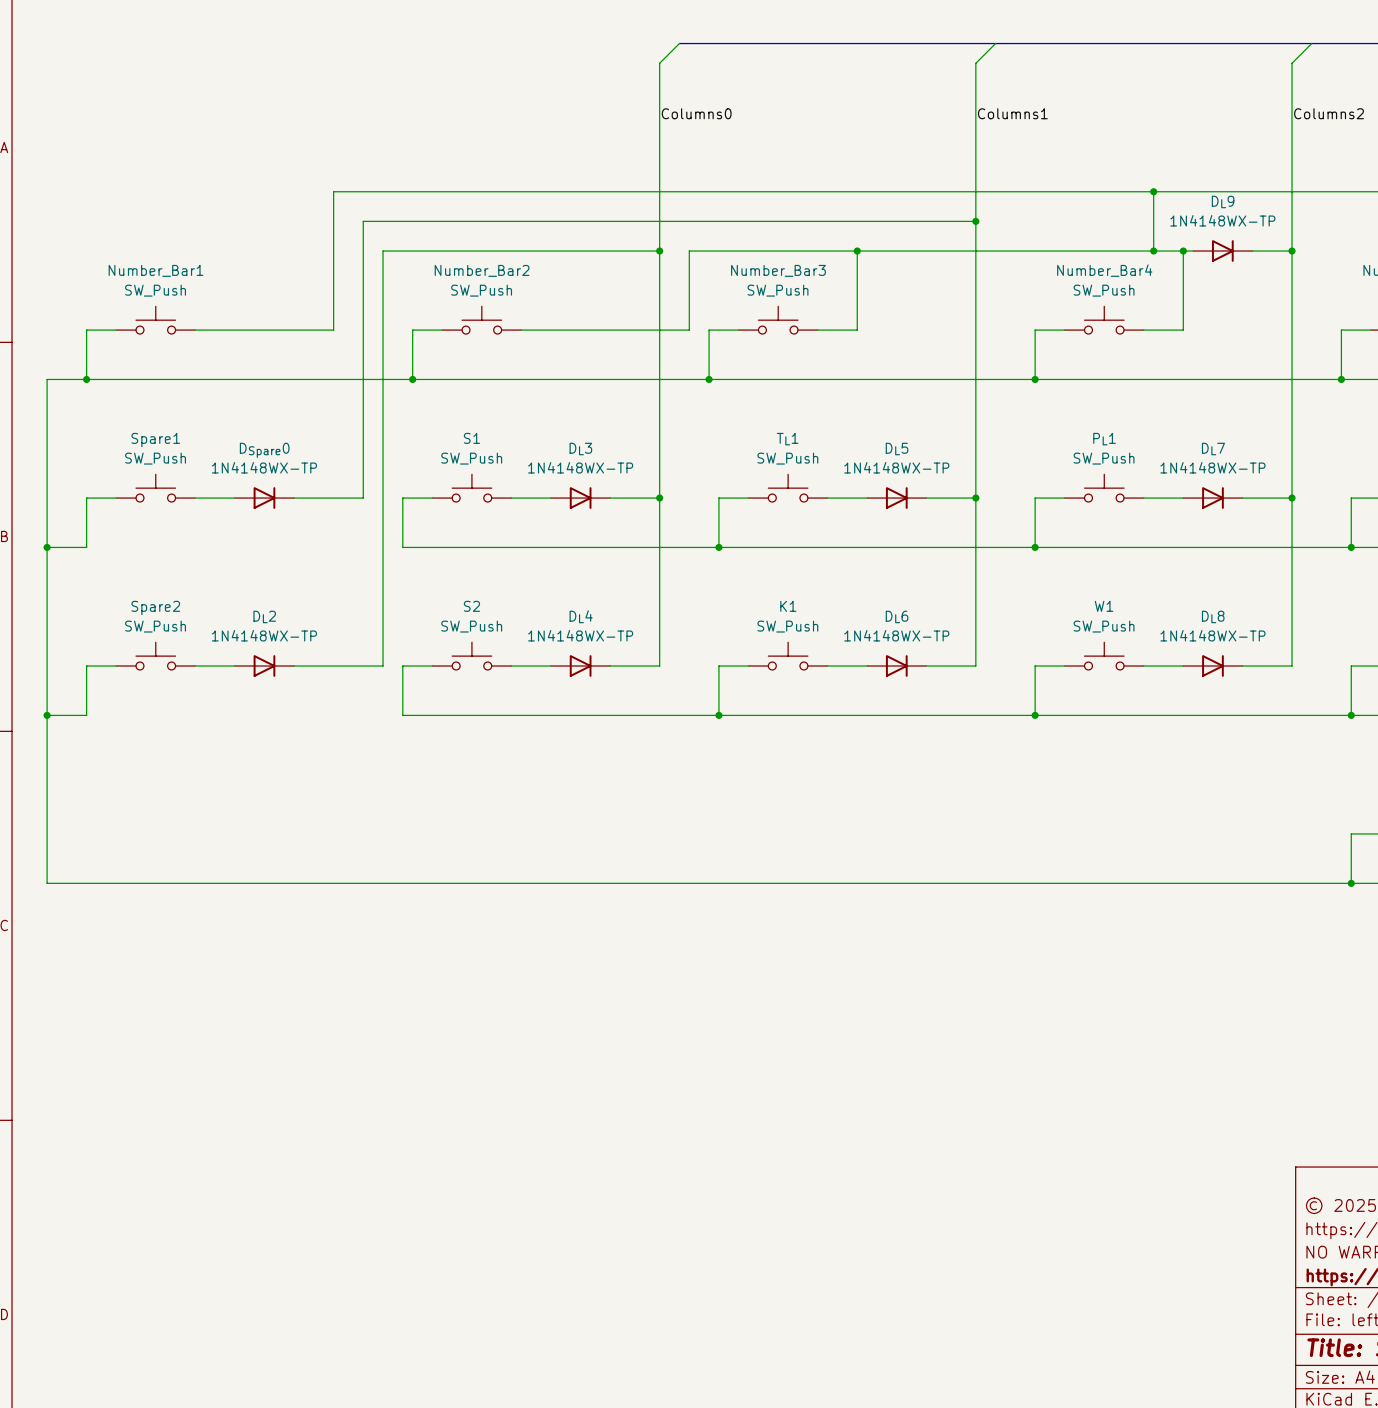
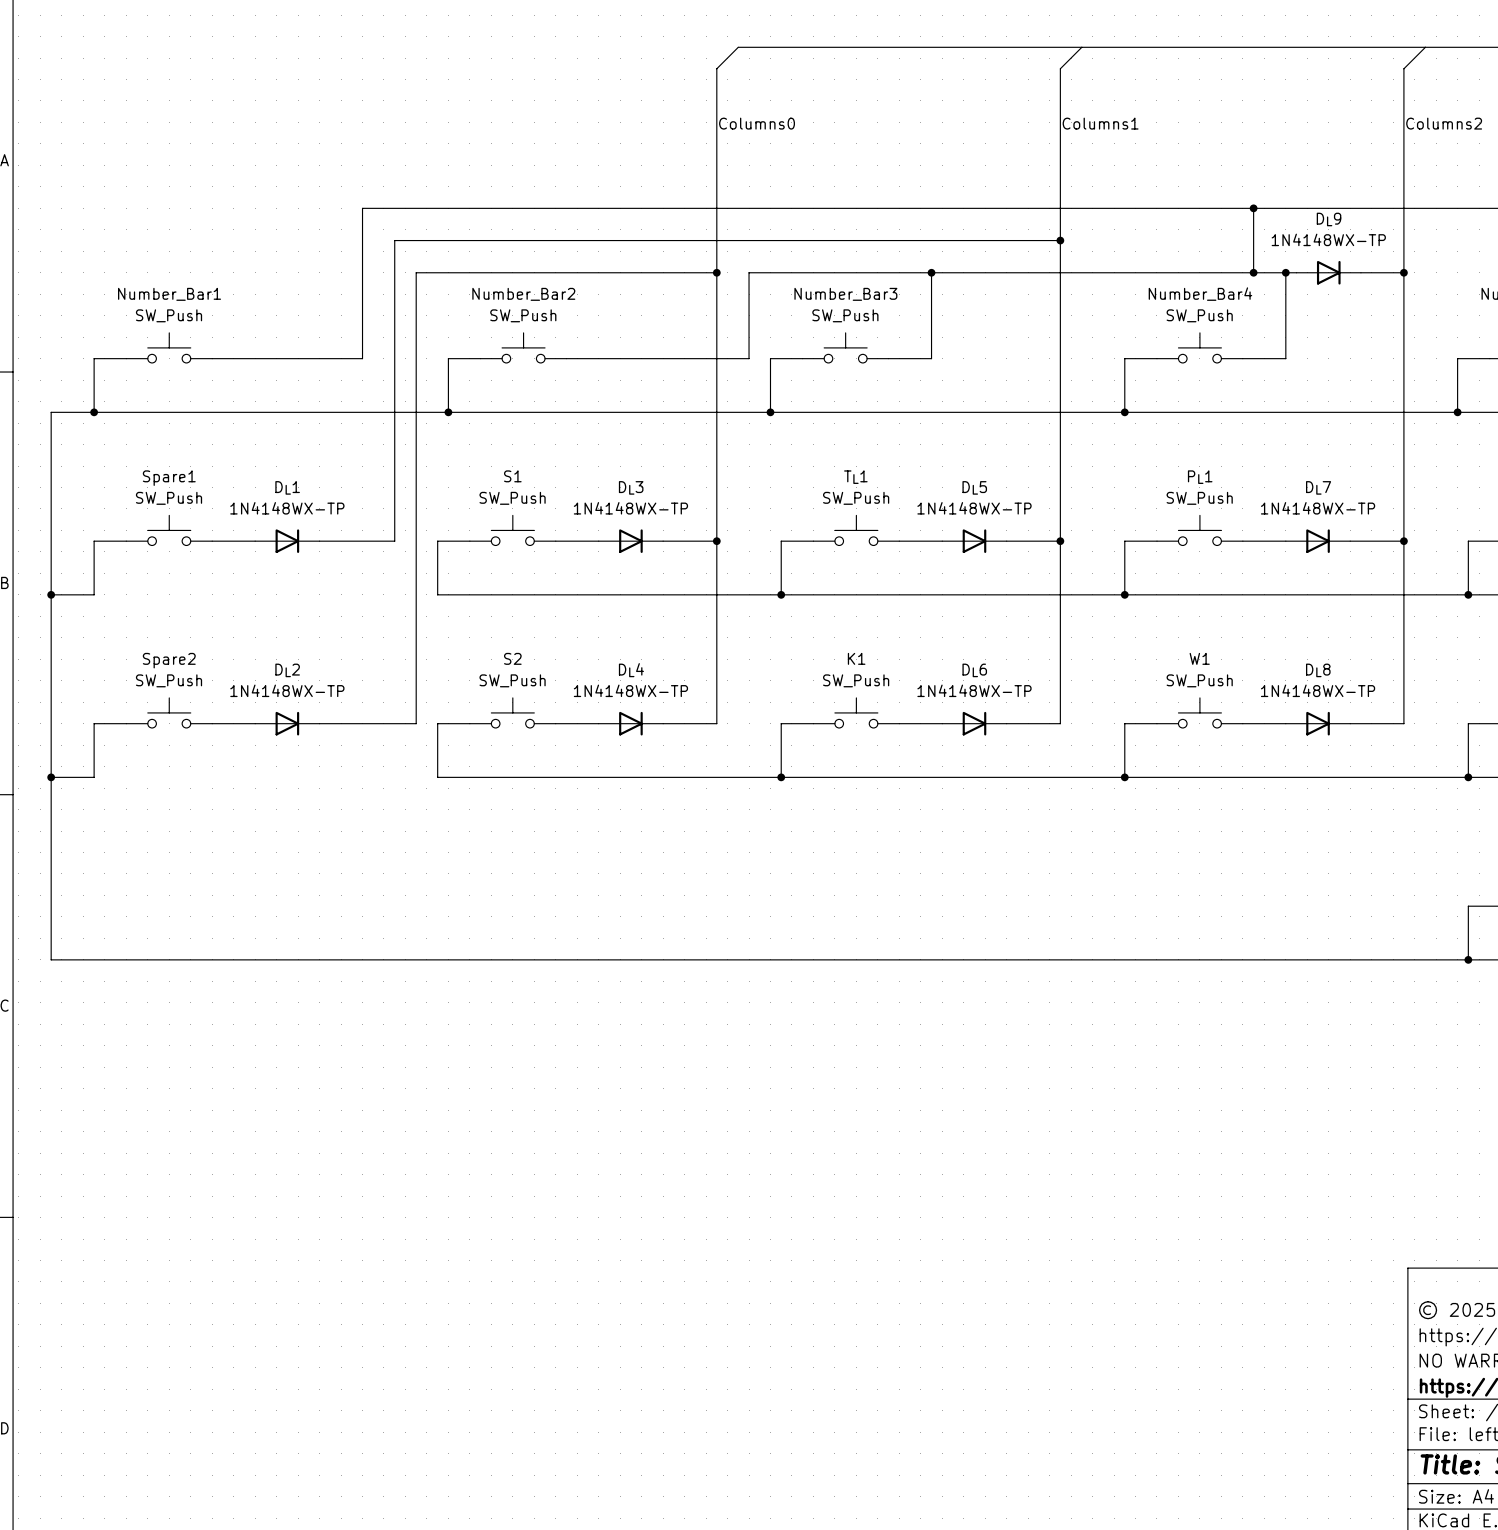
DSpare0 name: DSpare0 (264, 450) -> DL1 (287, 487)

